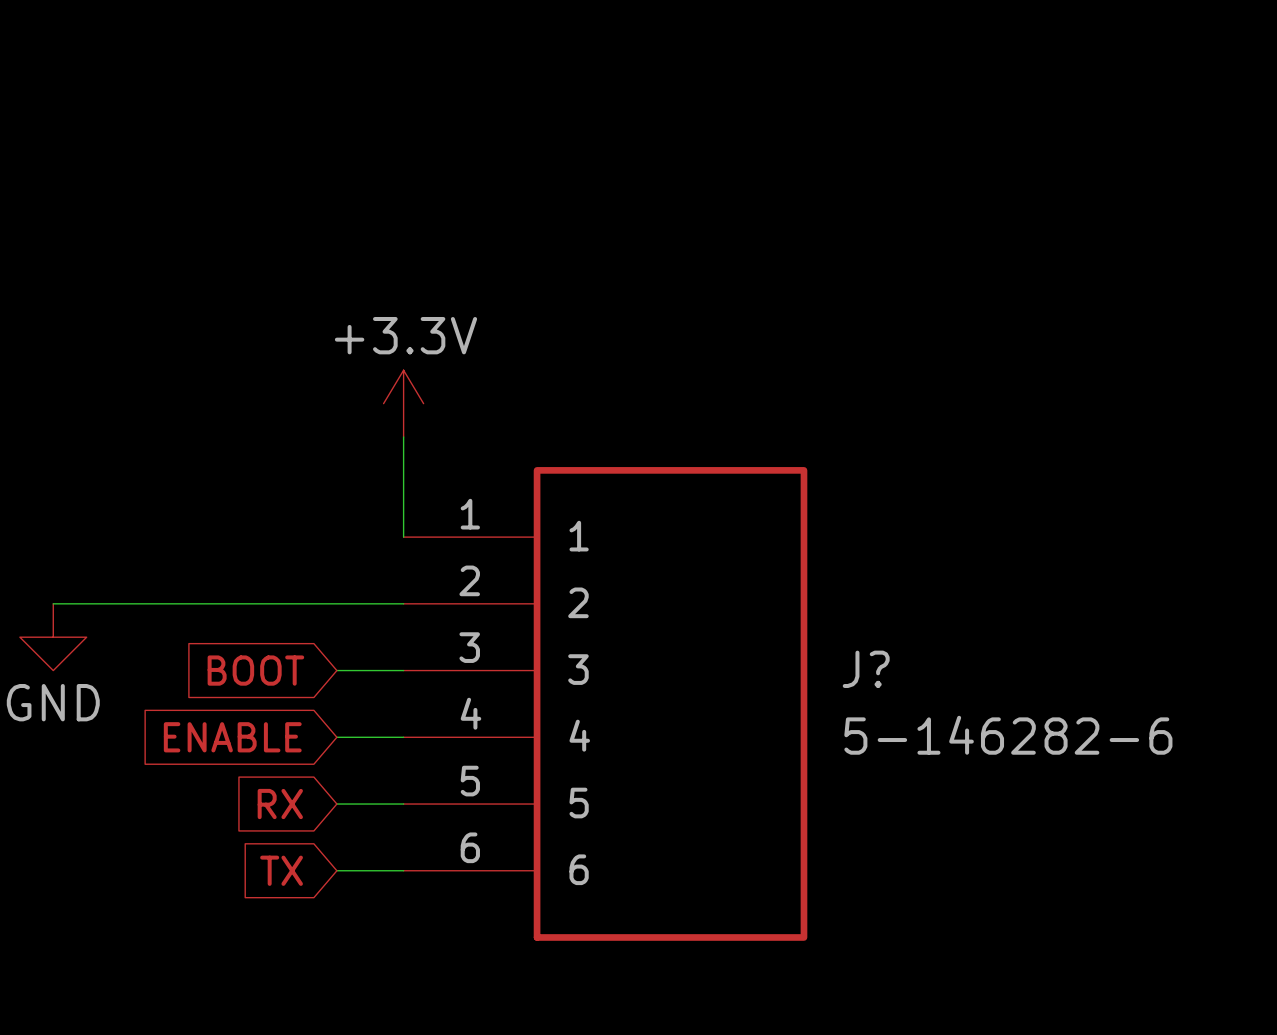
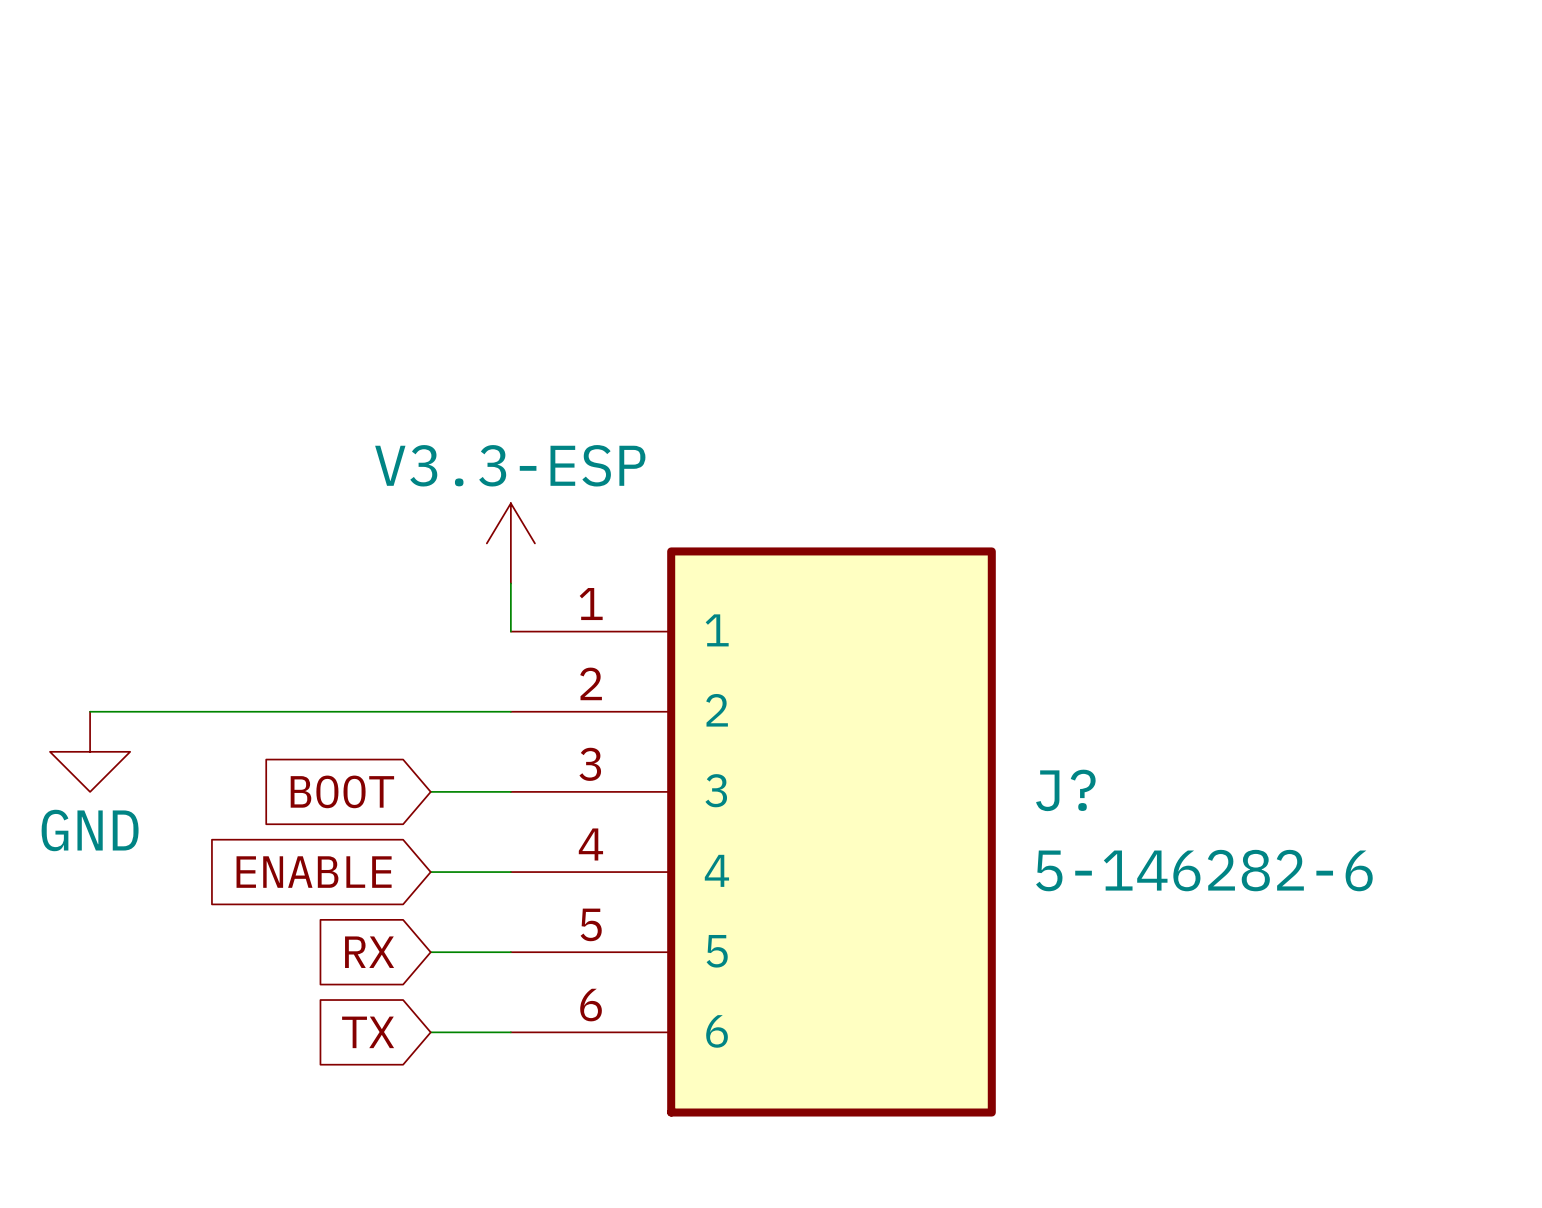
power symbol: +3.3V (403, 403) -> none
power symbol: none -> V3.3-ESP (510, 543)

